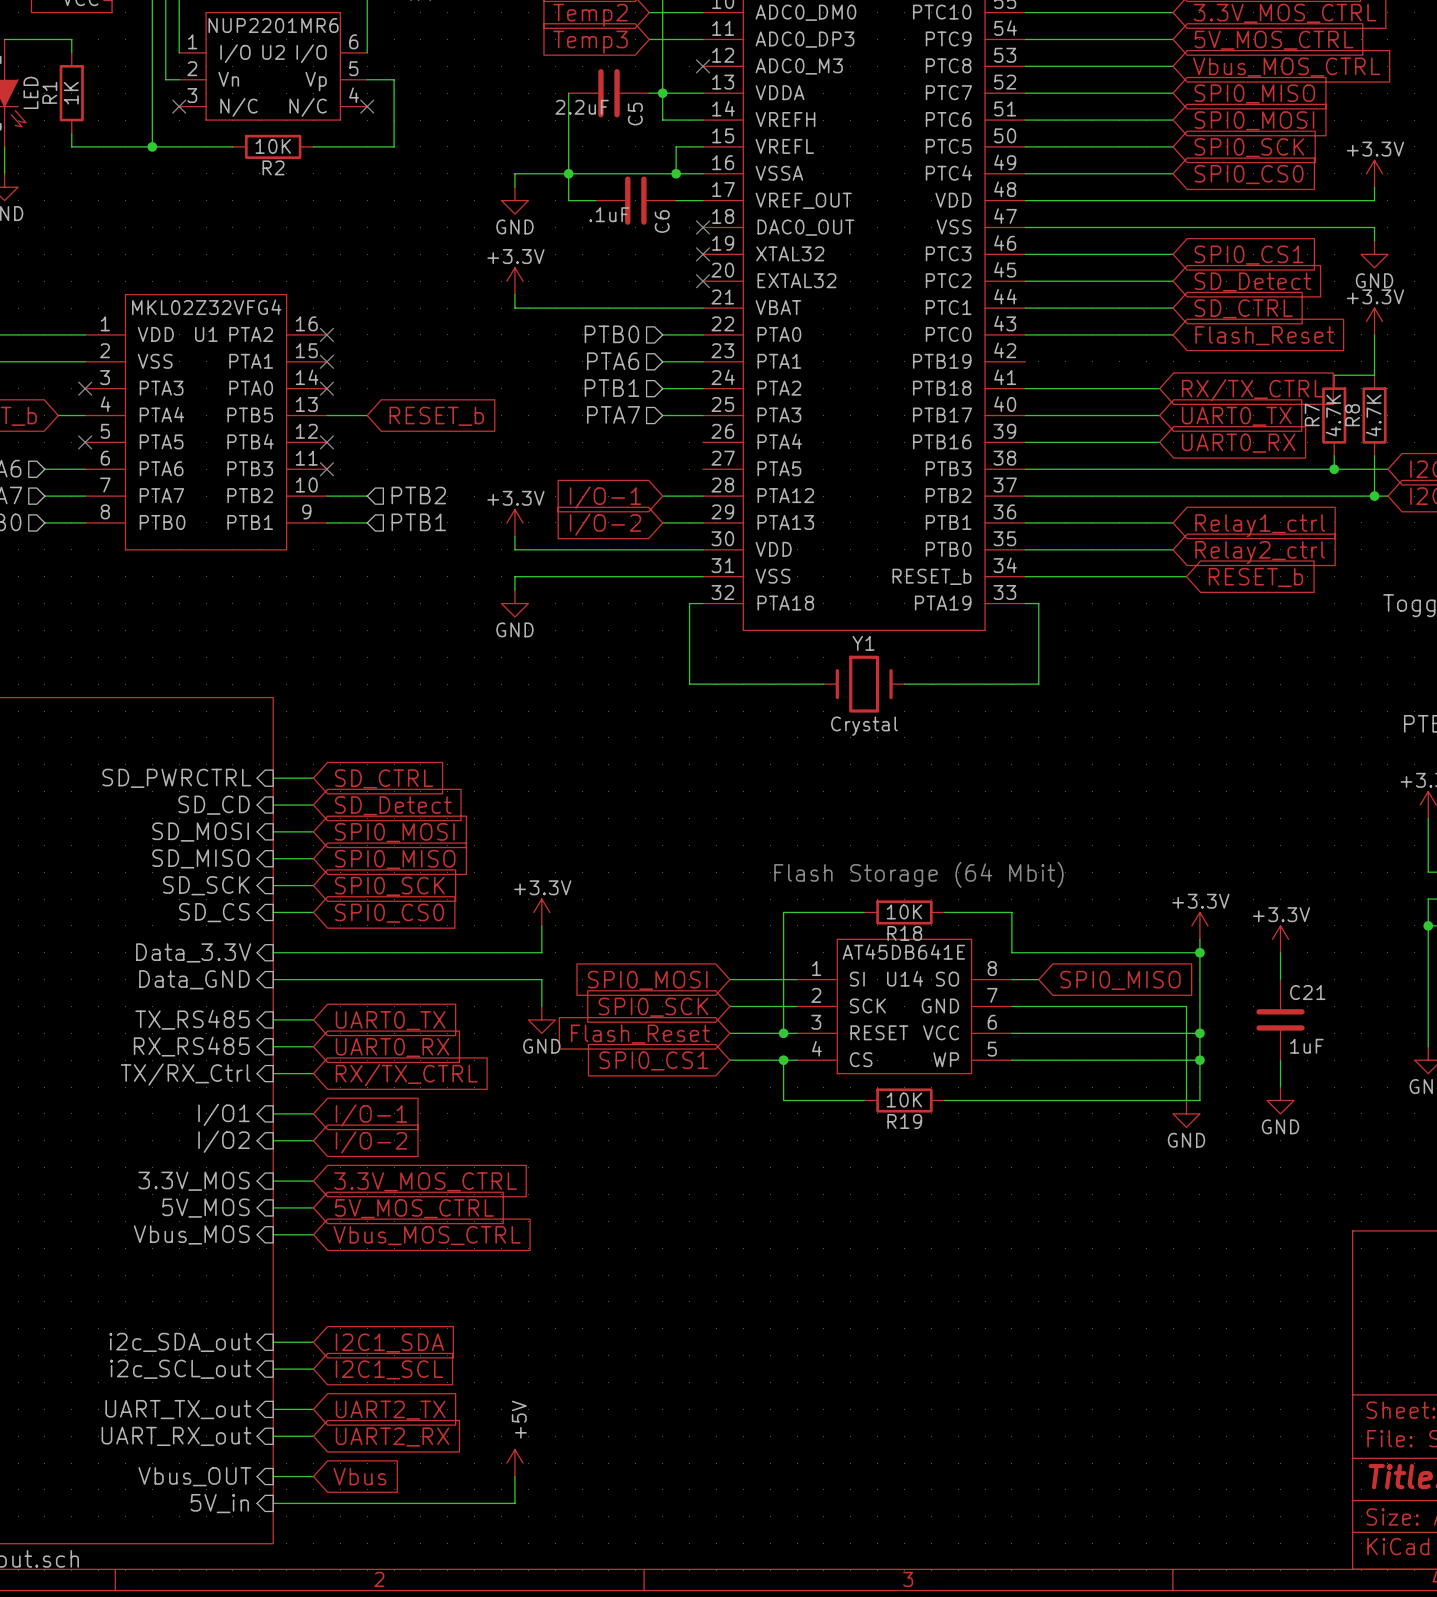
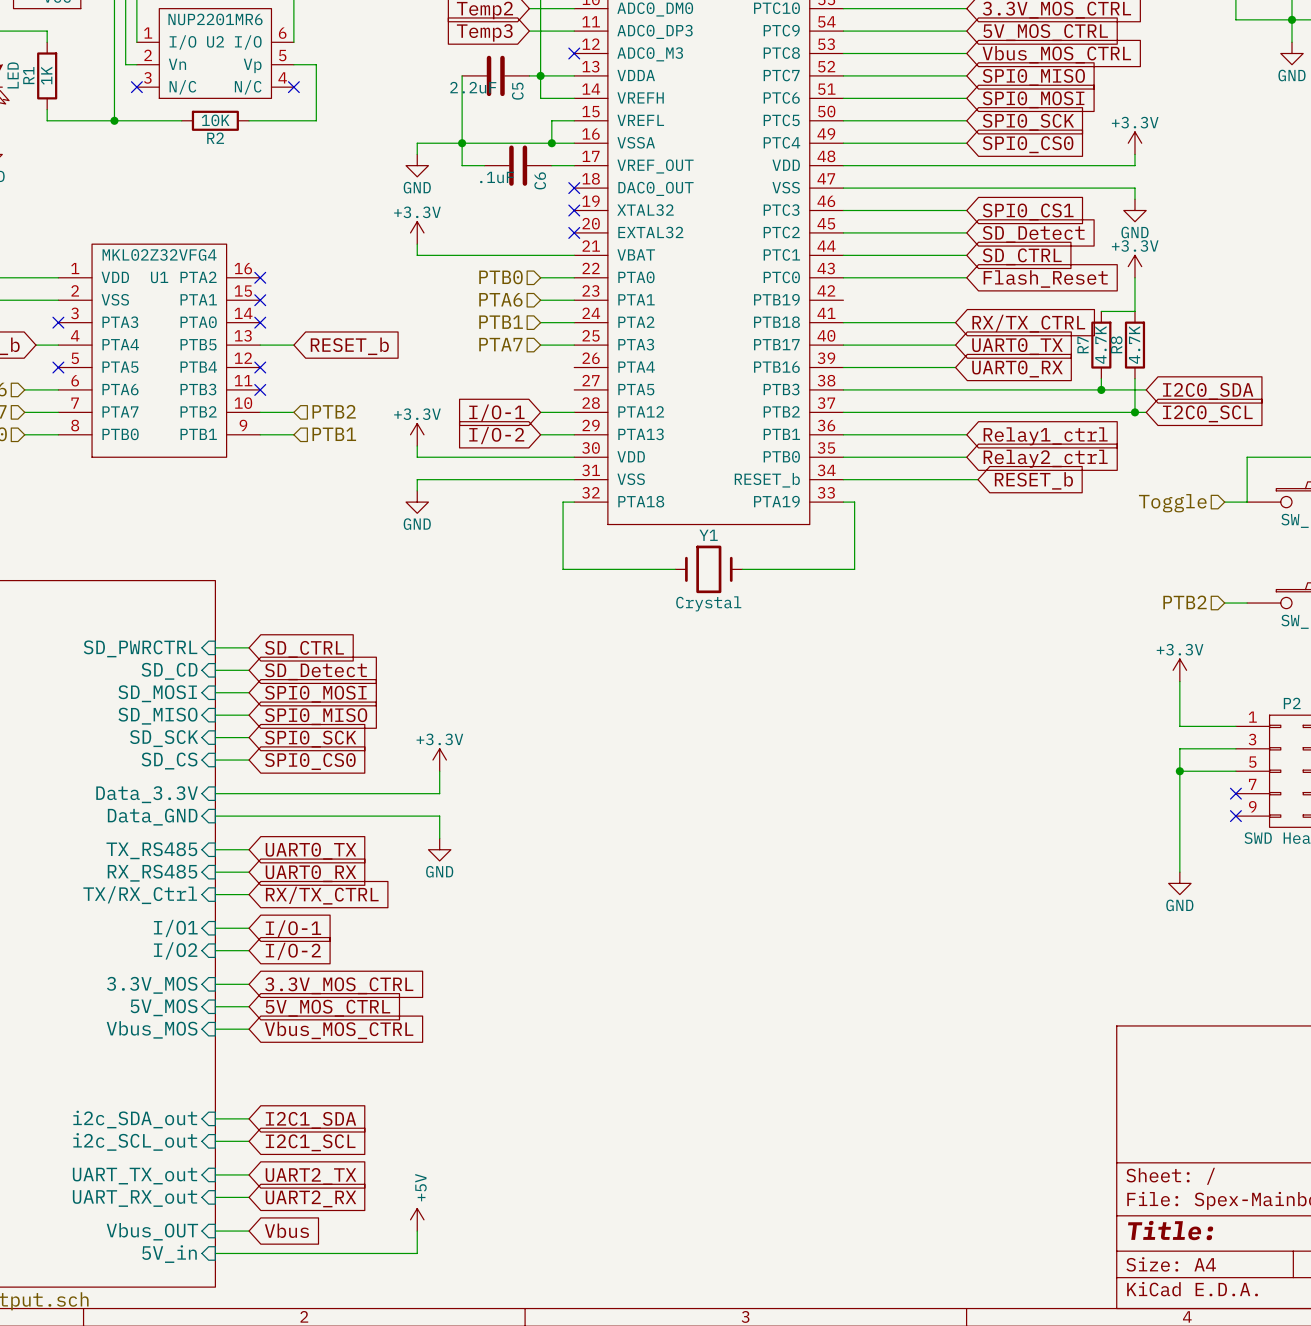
text: Flash Storage (64 Mbit) (918, 874) -> none
wire: (864, 912) (783, 912) (783, 1033) -> none
R18: 10K (904, 912) -> none
wire: (944, 912) (1011, 912) (1011, 952) (1199, 952) -> none
power symbol: +3.3V (1199, 925) -> none
wire: (1199, 939) (1199, 1100) (944, 1100) -> none
power symbol: +3.3V (1280, 939) -> none
junction: (1199, 952) -> none
wire: (1280, 952) (1280, 979) -> none
wire: (729, 979) (797, 979) -> none
wire: (1011, 979) (1038, 979) -> none
global label: SPI0_MOSI (647, 980) -> none
global label: SPI0_MISO (1120, 980) -> none
wire: (729, 1006) (797, 1006) -> none
U14: AT45DB641E (904, 1006) -> none
wire: (1011, 1006) (1186, 1006) (1186, 1100) -> none
global label: SPI0_SCK (653, 1007) -> none
C21: 1uF (1280, 1019) -> none
wire: (729, 1033) (797, 1033) -> none
junction: (783, 1033) -> none
wire: (1011, 1033) (1199, 1033) -> none
junction: (1199, 1033) -> none
global label: Flash_Reset (640, 1034) -> none
global label: SPI0_CS1 (653, 1060) -> none
wire: (729, 1060) (797, 1060) -> none
wire: (783, 1060) (783, 1100) (864, 1100) -> none
junction: (783, 1060) -> none
wire: (1011, 1060) (1199, 1060) -> none
junction: (1199, 1060) -> none
wire: (1280, 1060) (1280, 1087) -> none
R19: 10K (904, 1100) -> none
power symbol: GND (1280, 1100) -> none
power symbol: GND (1186, 1113) -> none

